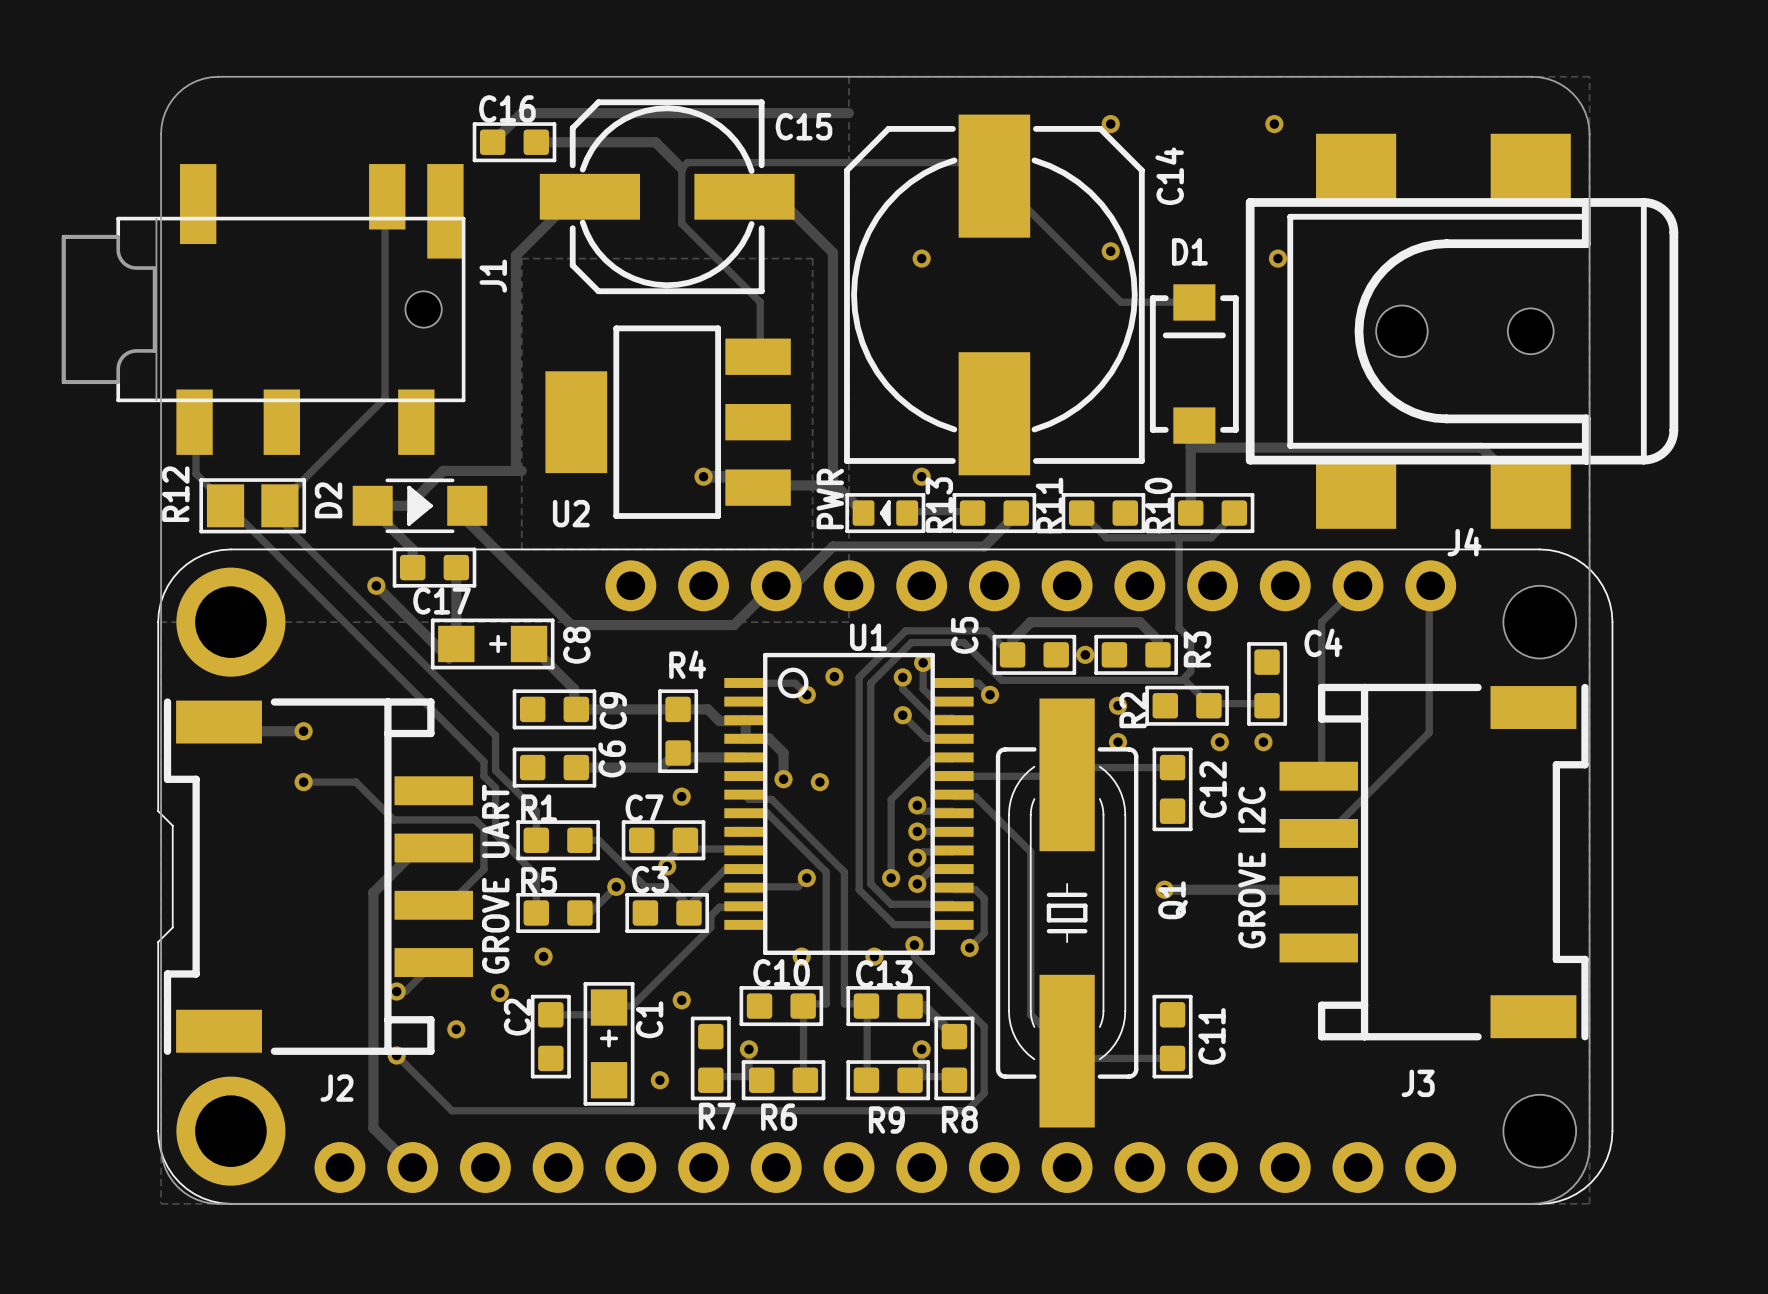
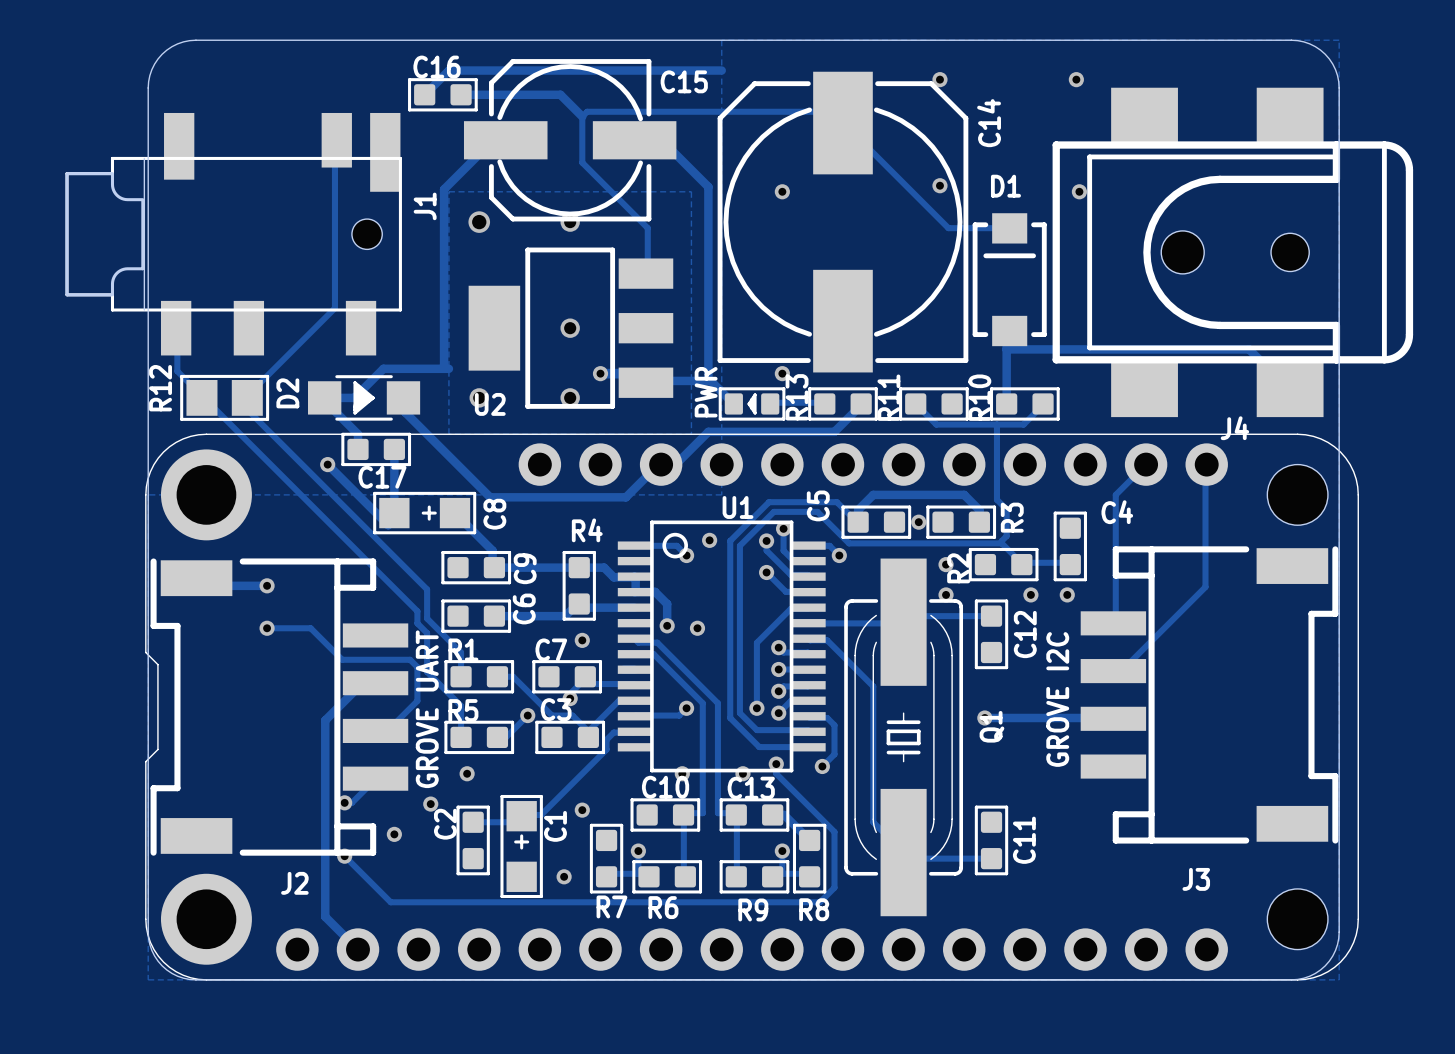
via: none -> (479, 222)
via: none -> (570, 222)
via: none -> (570, 328)
via: none -> (479, 397)
via: none -> (570, 397)

